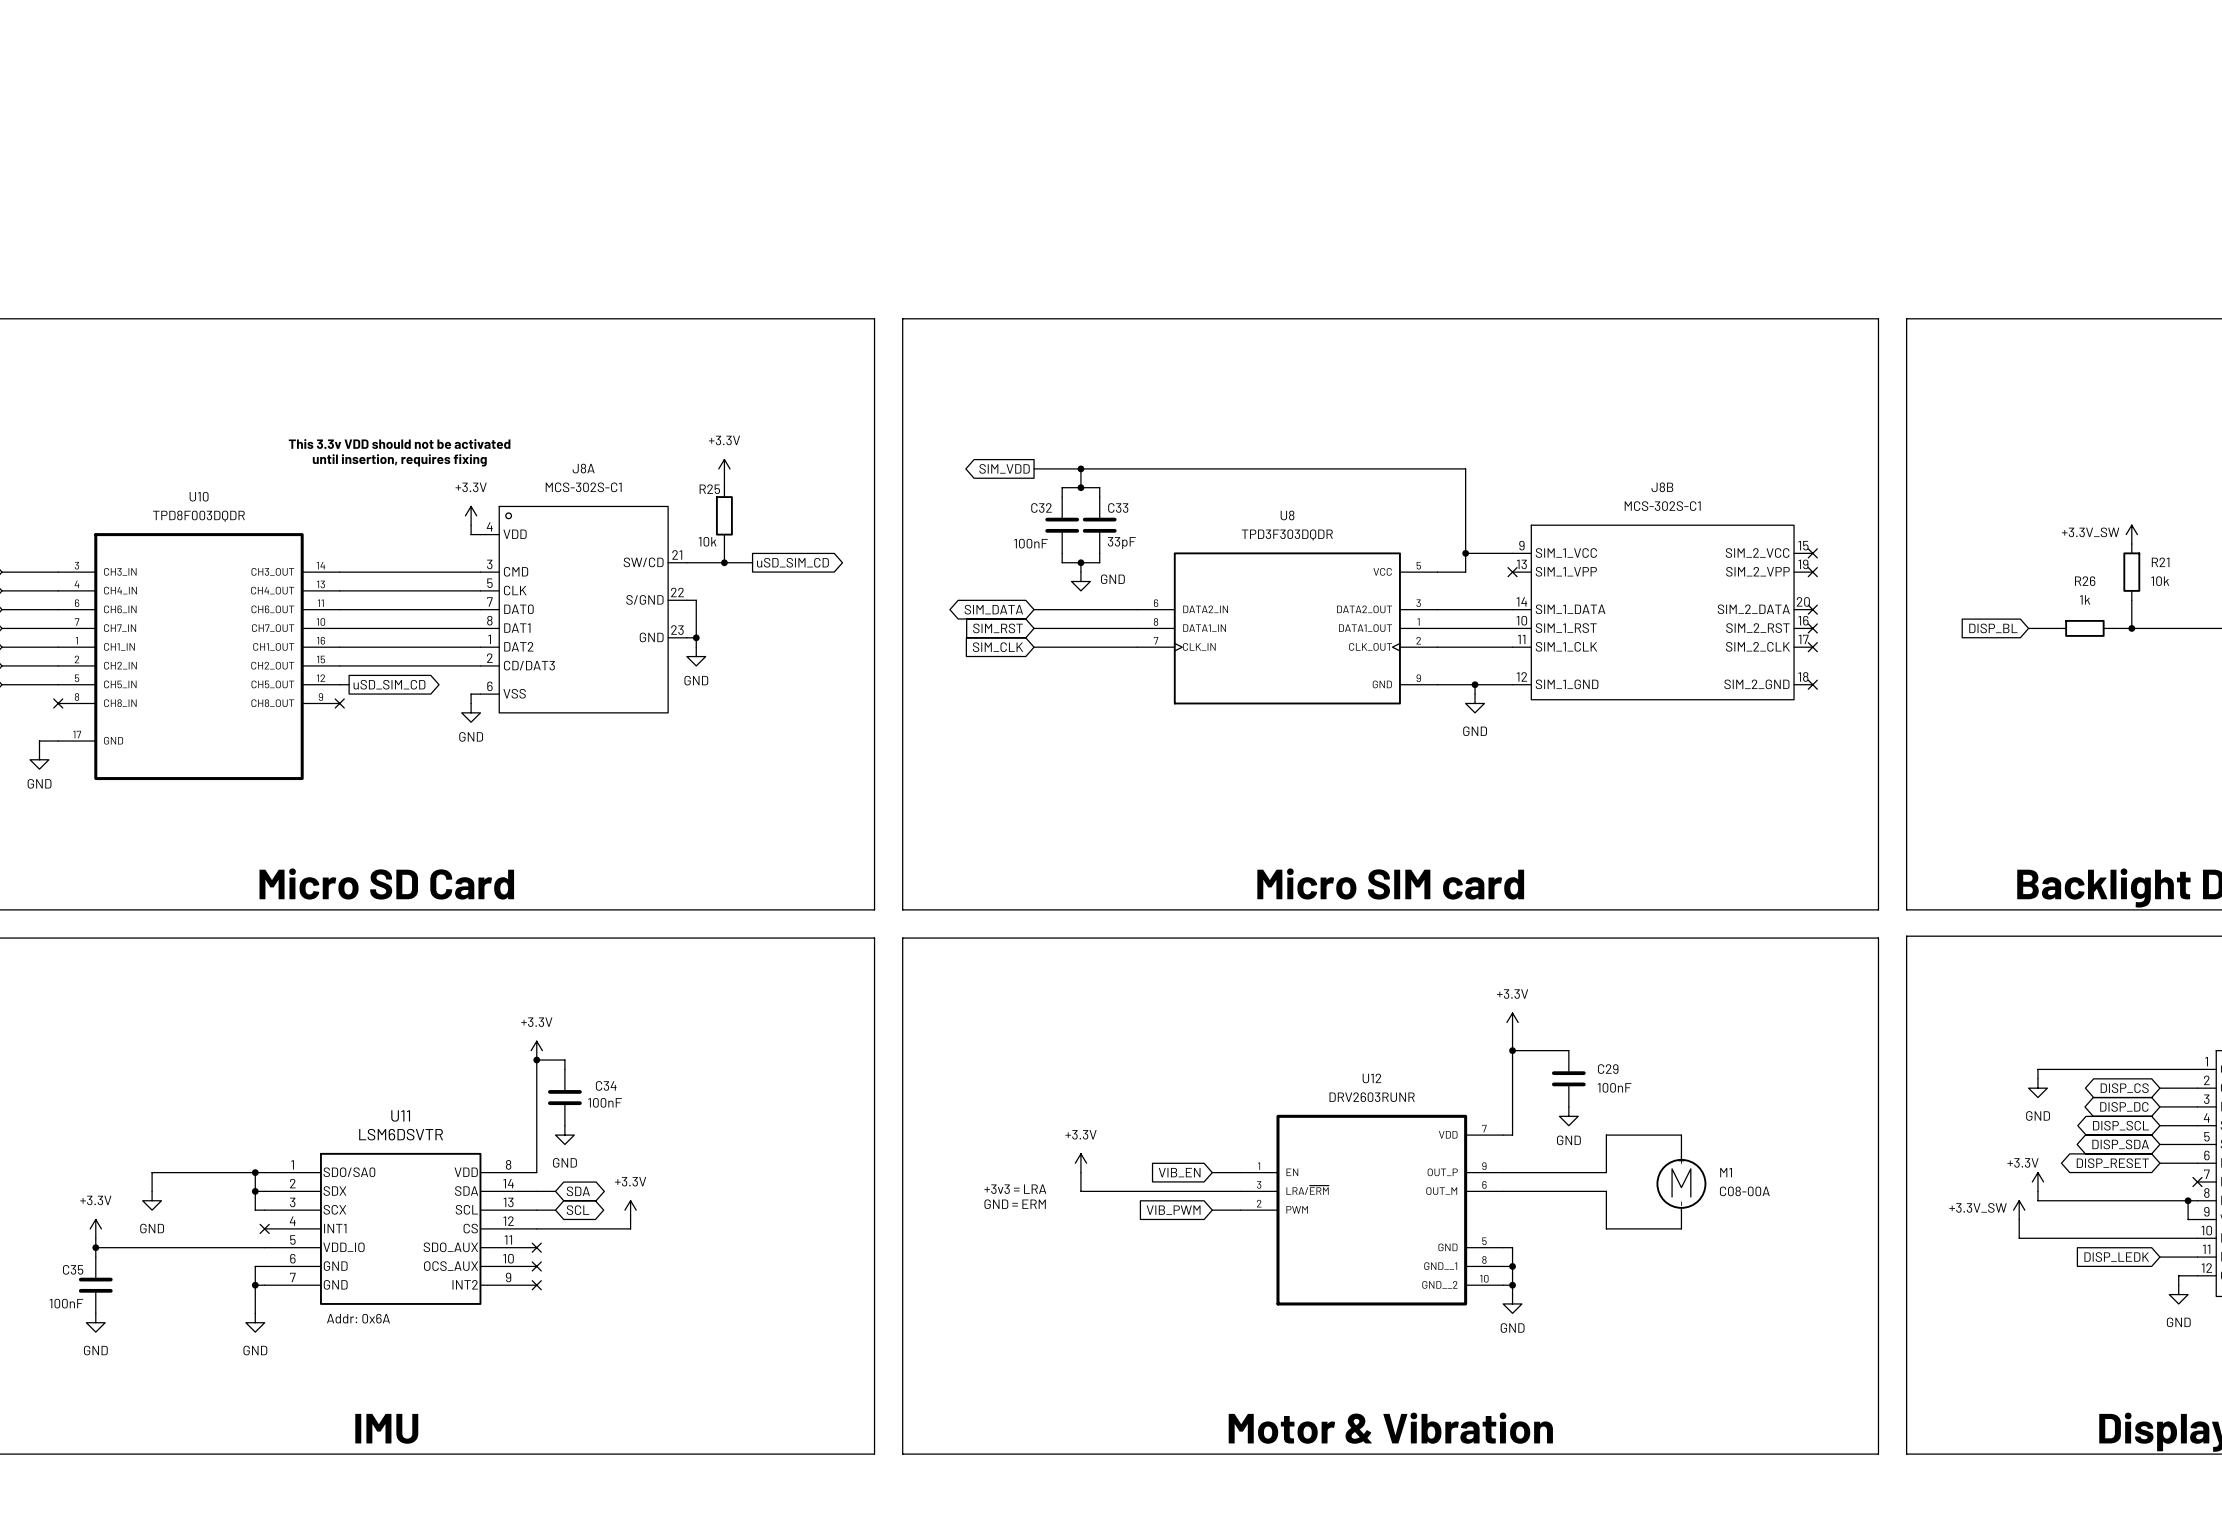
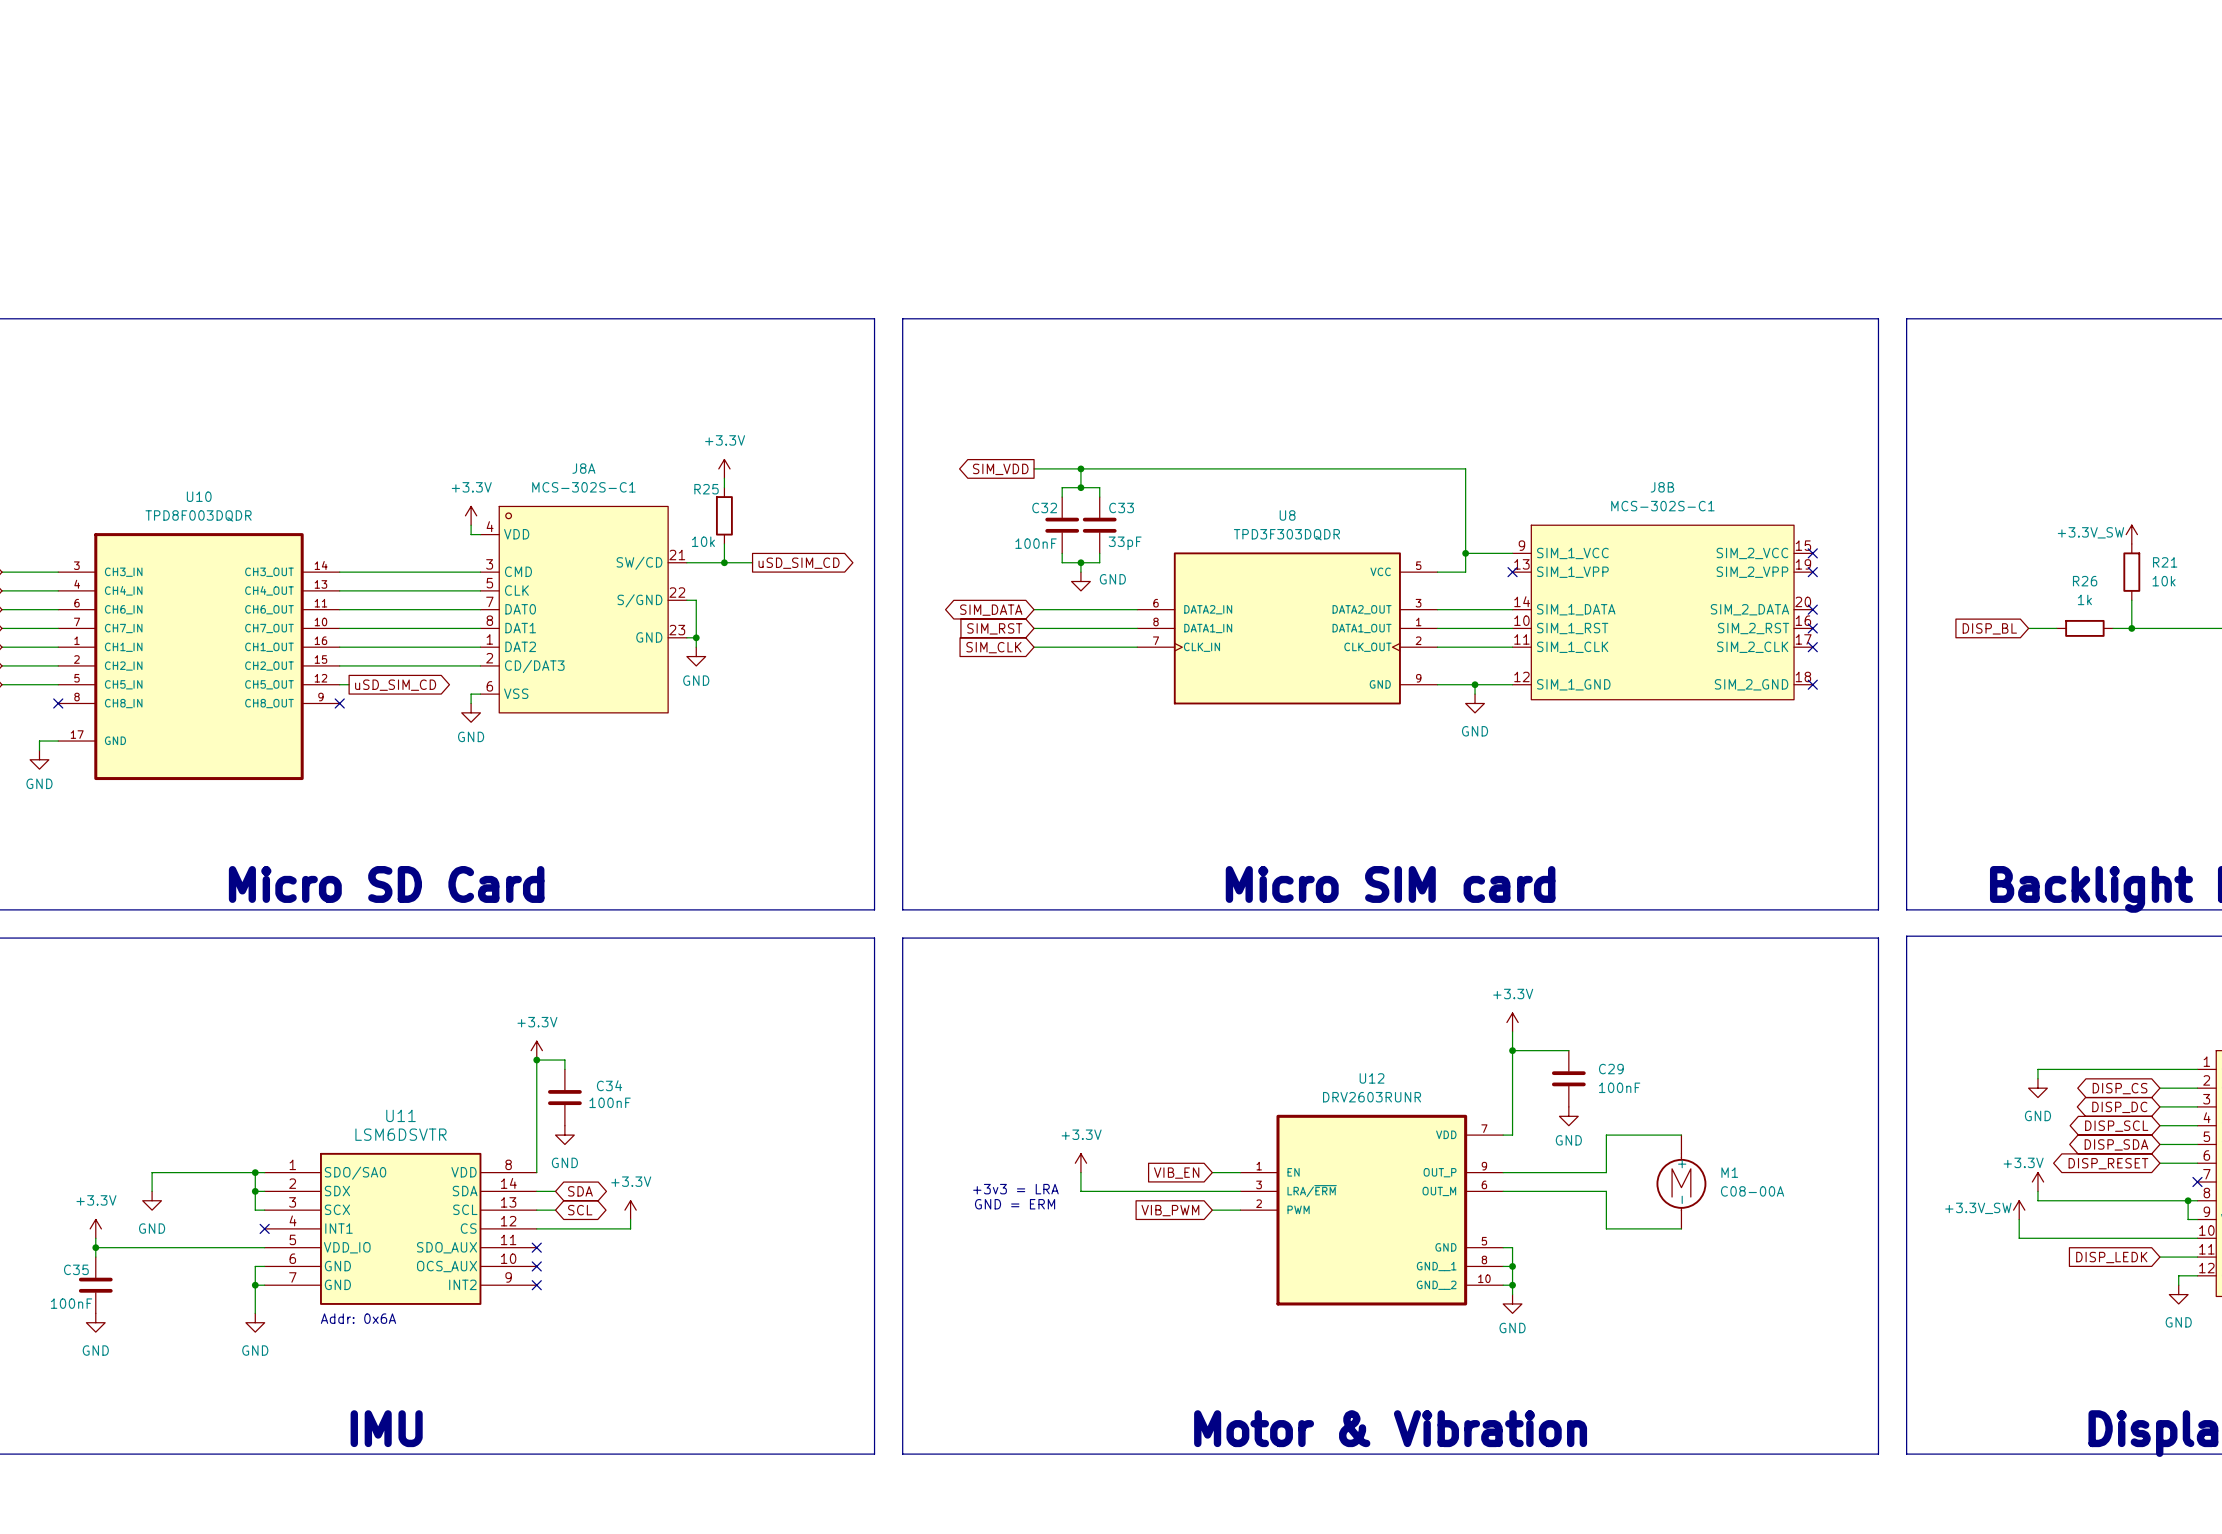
text: This 3.3v VDD should not be activated (399, 444) -> none
text: until insertion, requires fixing (399, 460) -> none

